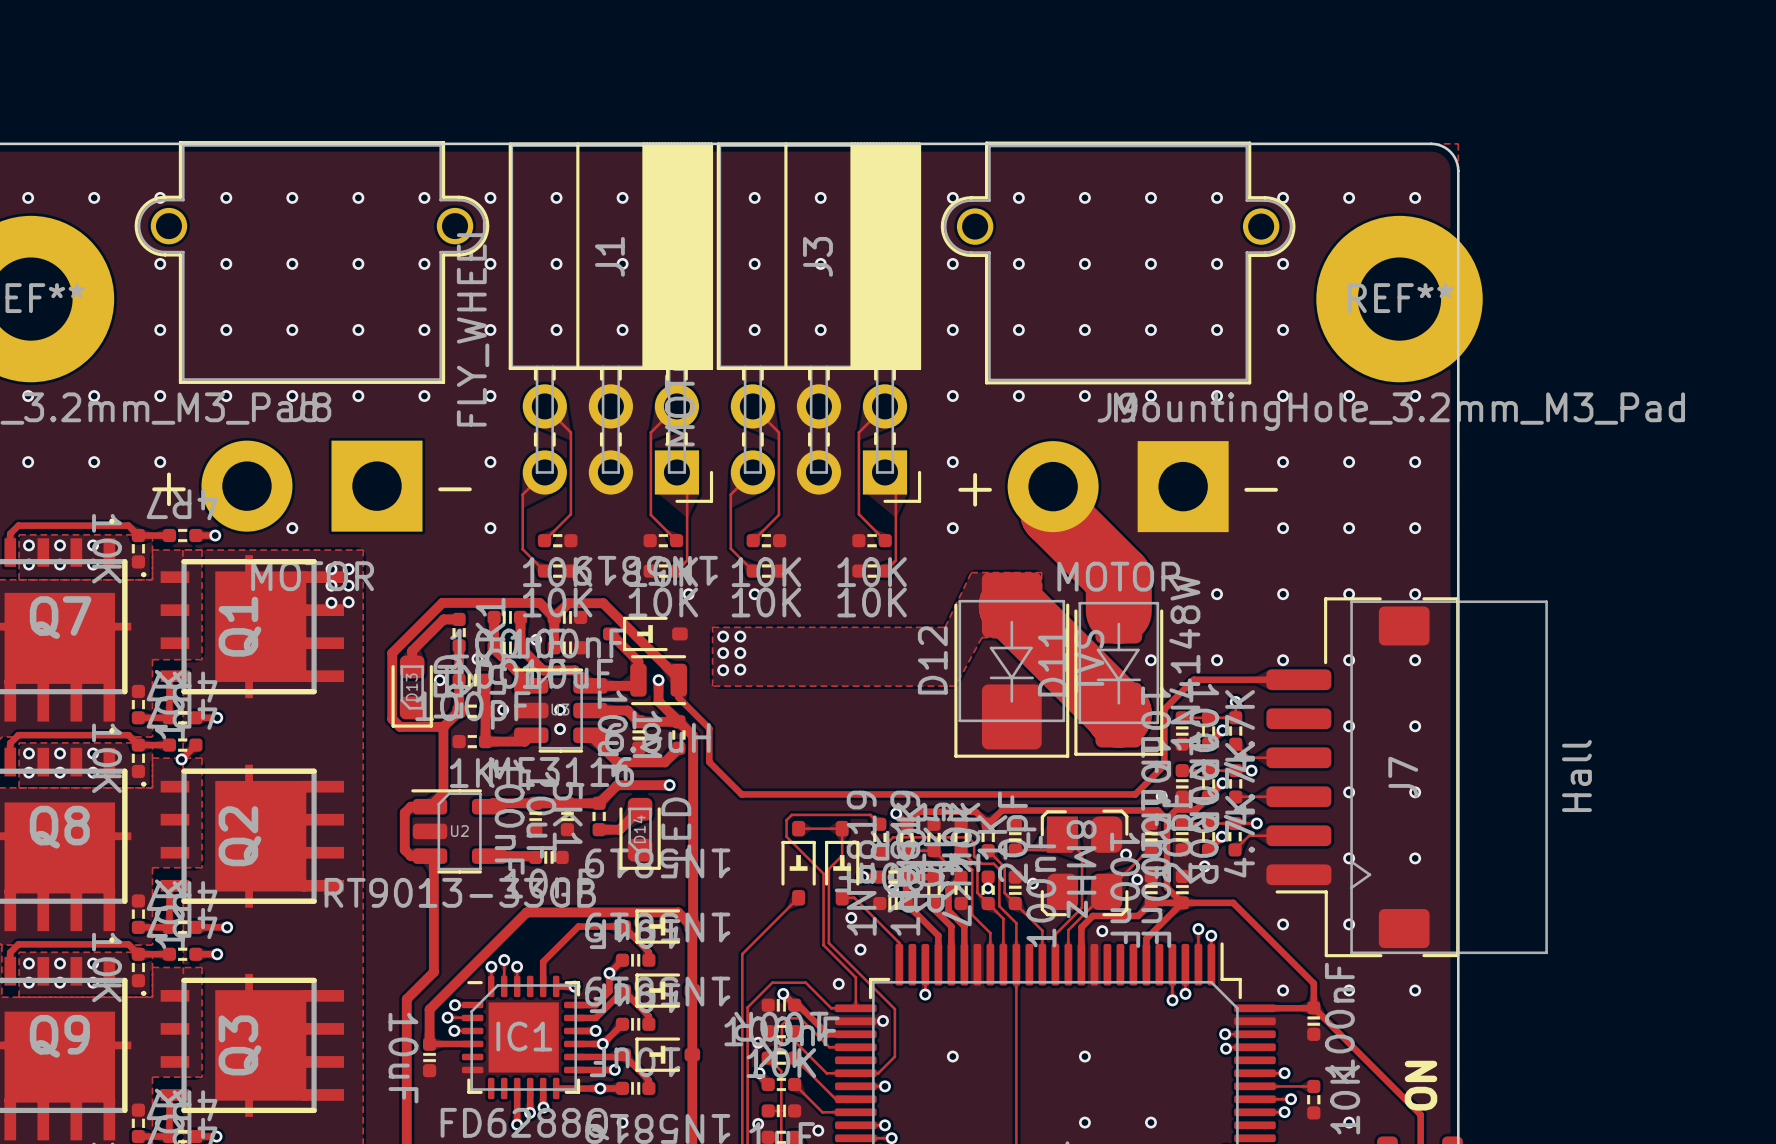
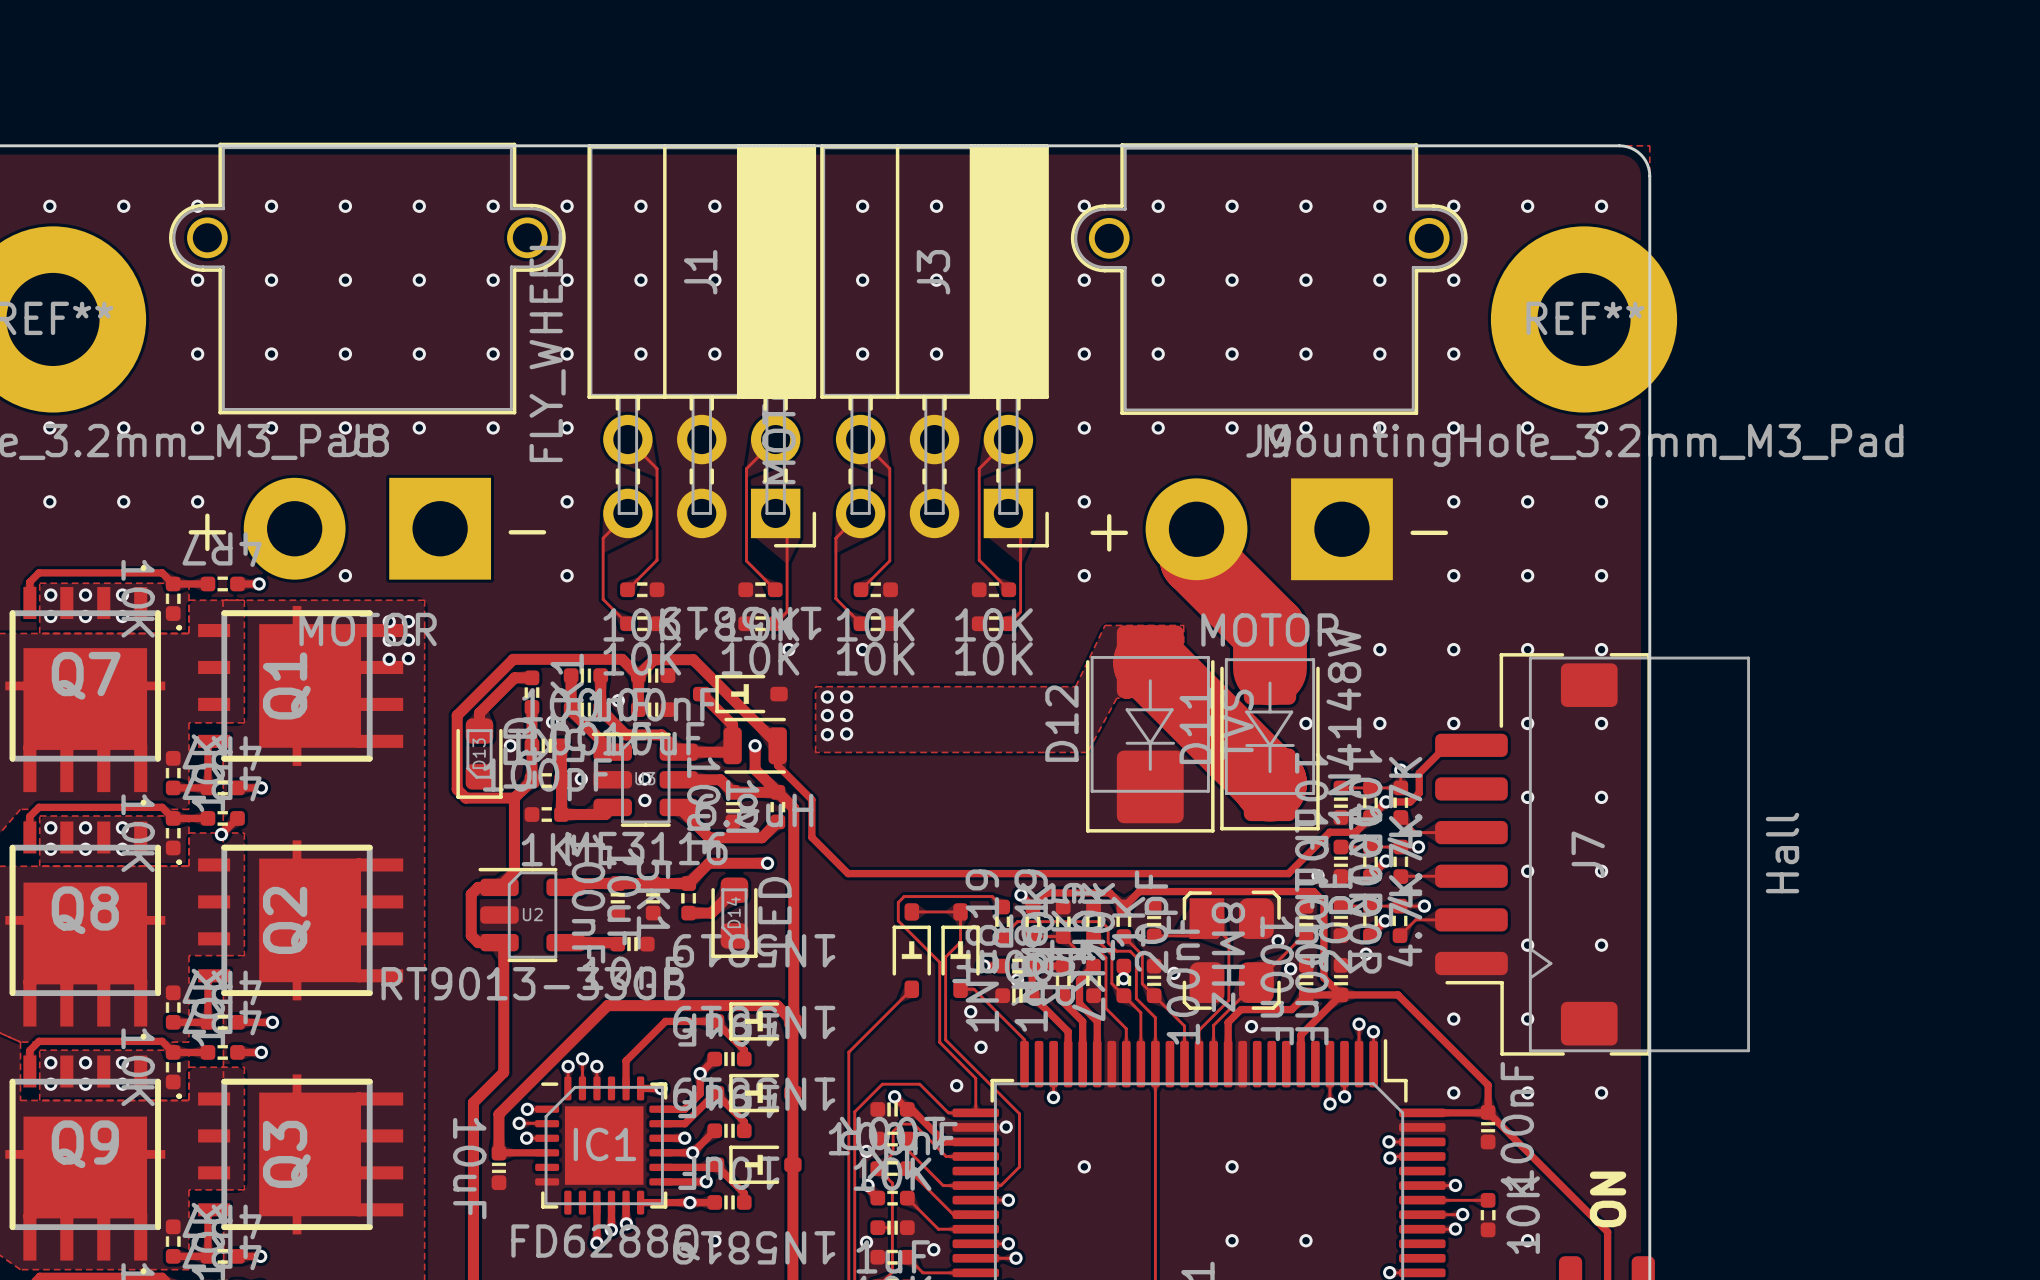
track: (1277, 679) (1193, 679) (1164, 709) (1164, 765) -> (1447, 745) (1419, 773) (1419, 793) (1410, 801) (1385, 801)
track: none -> (1370, 817) (1355, 832) (1329, 832) (1320, 841)
track: (1208, 797) (1196, 809) (1176, 809) (1167, 819) -> none

